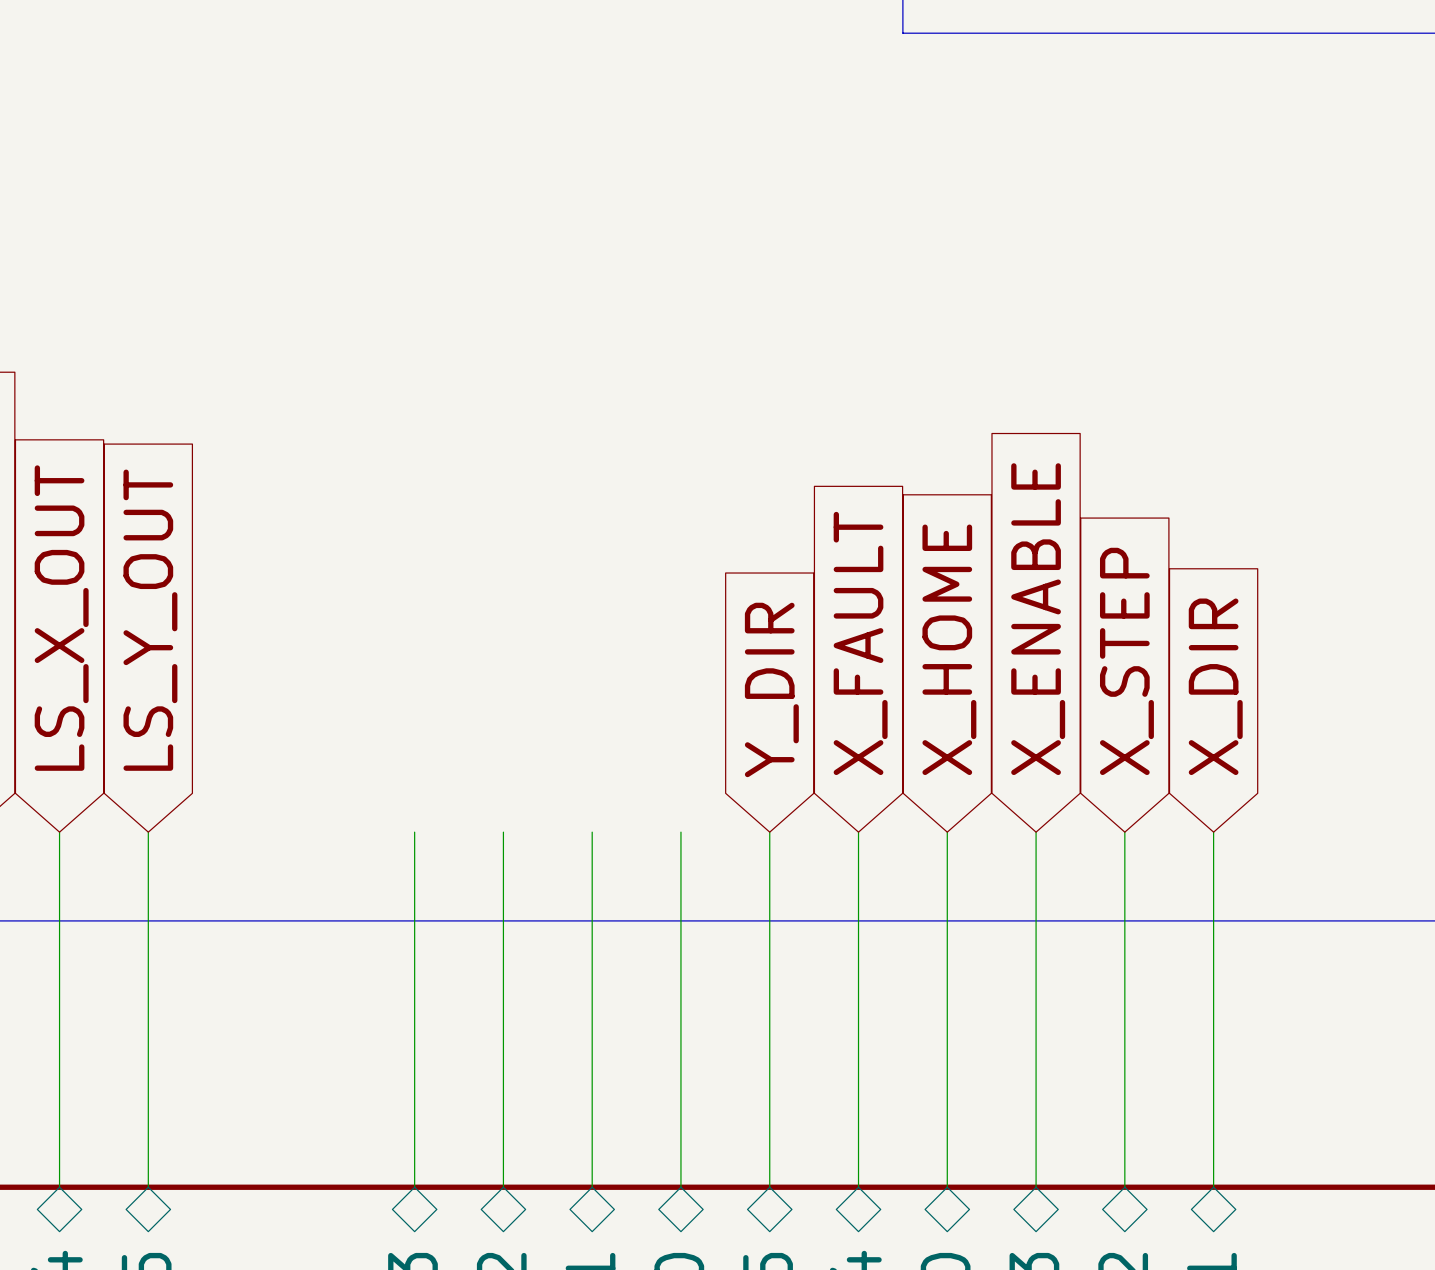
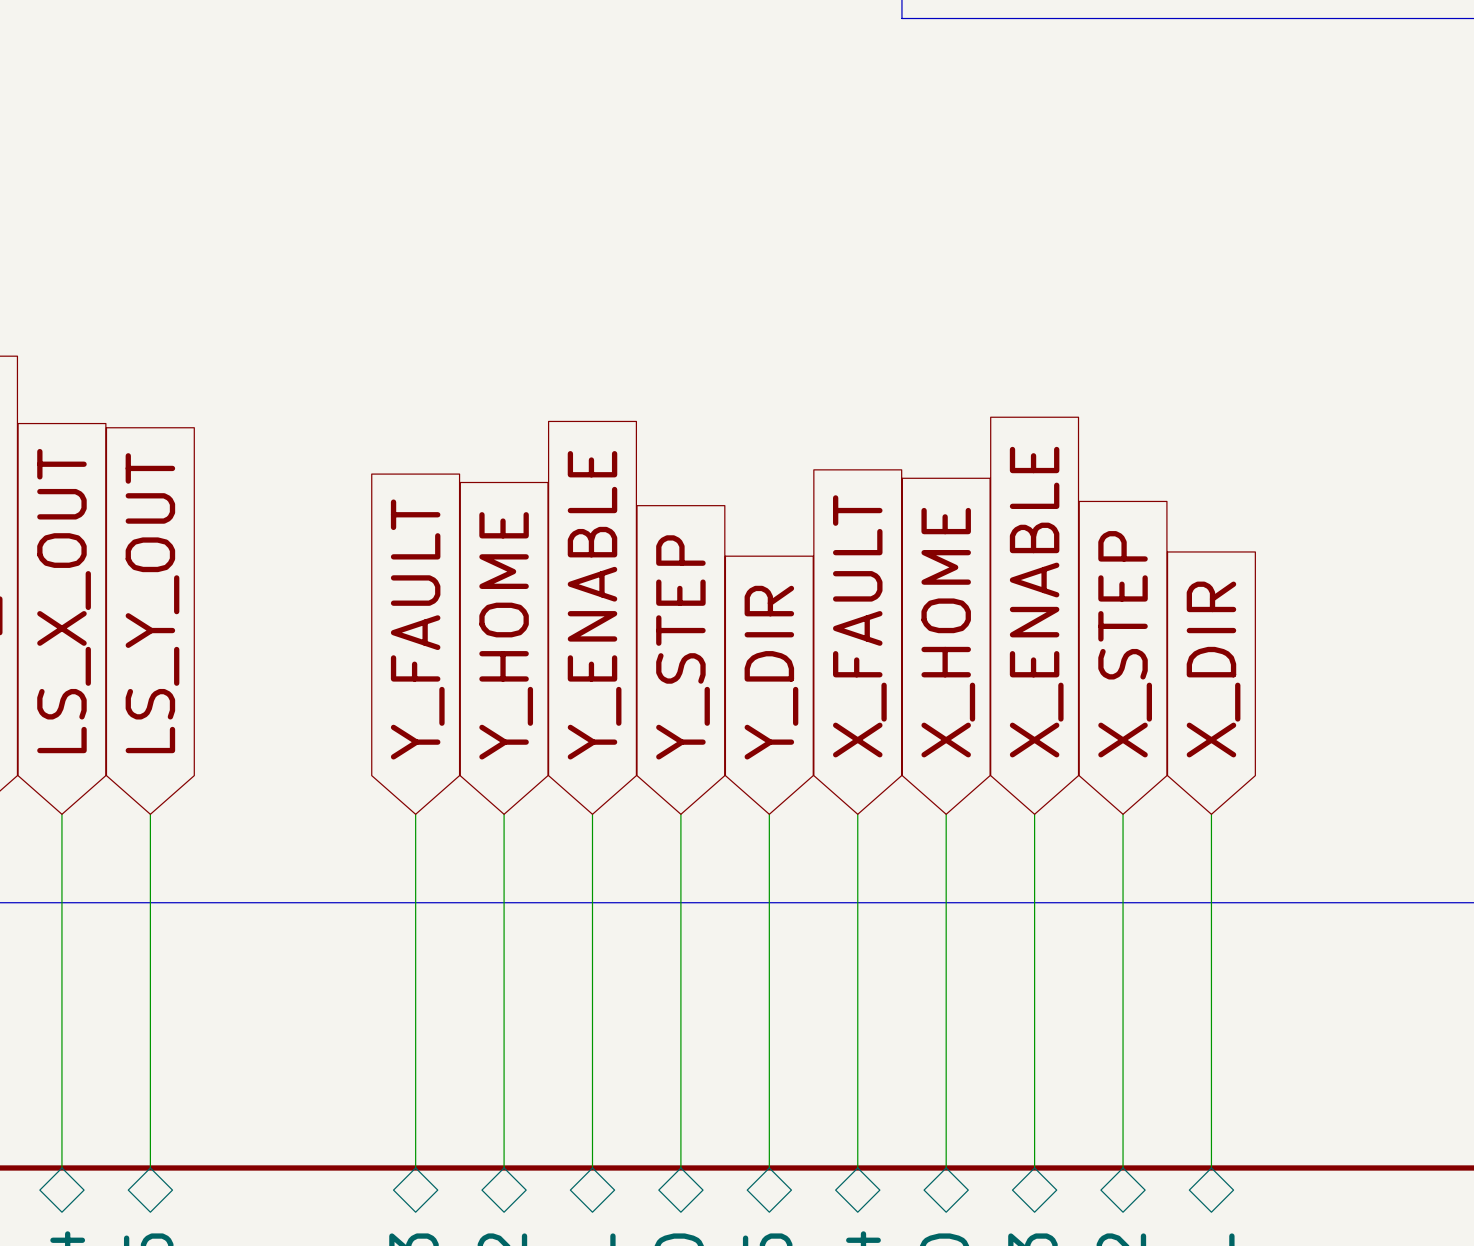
global label: none -> Y_ENABLE (594, 605)
global label: none -> Y_FAULT (417, 629)
global label: none -> Y_HOME (506, 635)
global label: none -> Y_STEP (683, 647)

